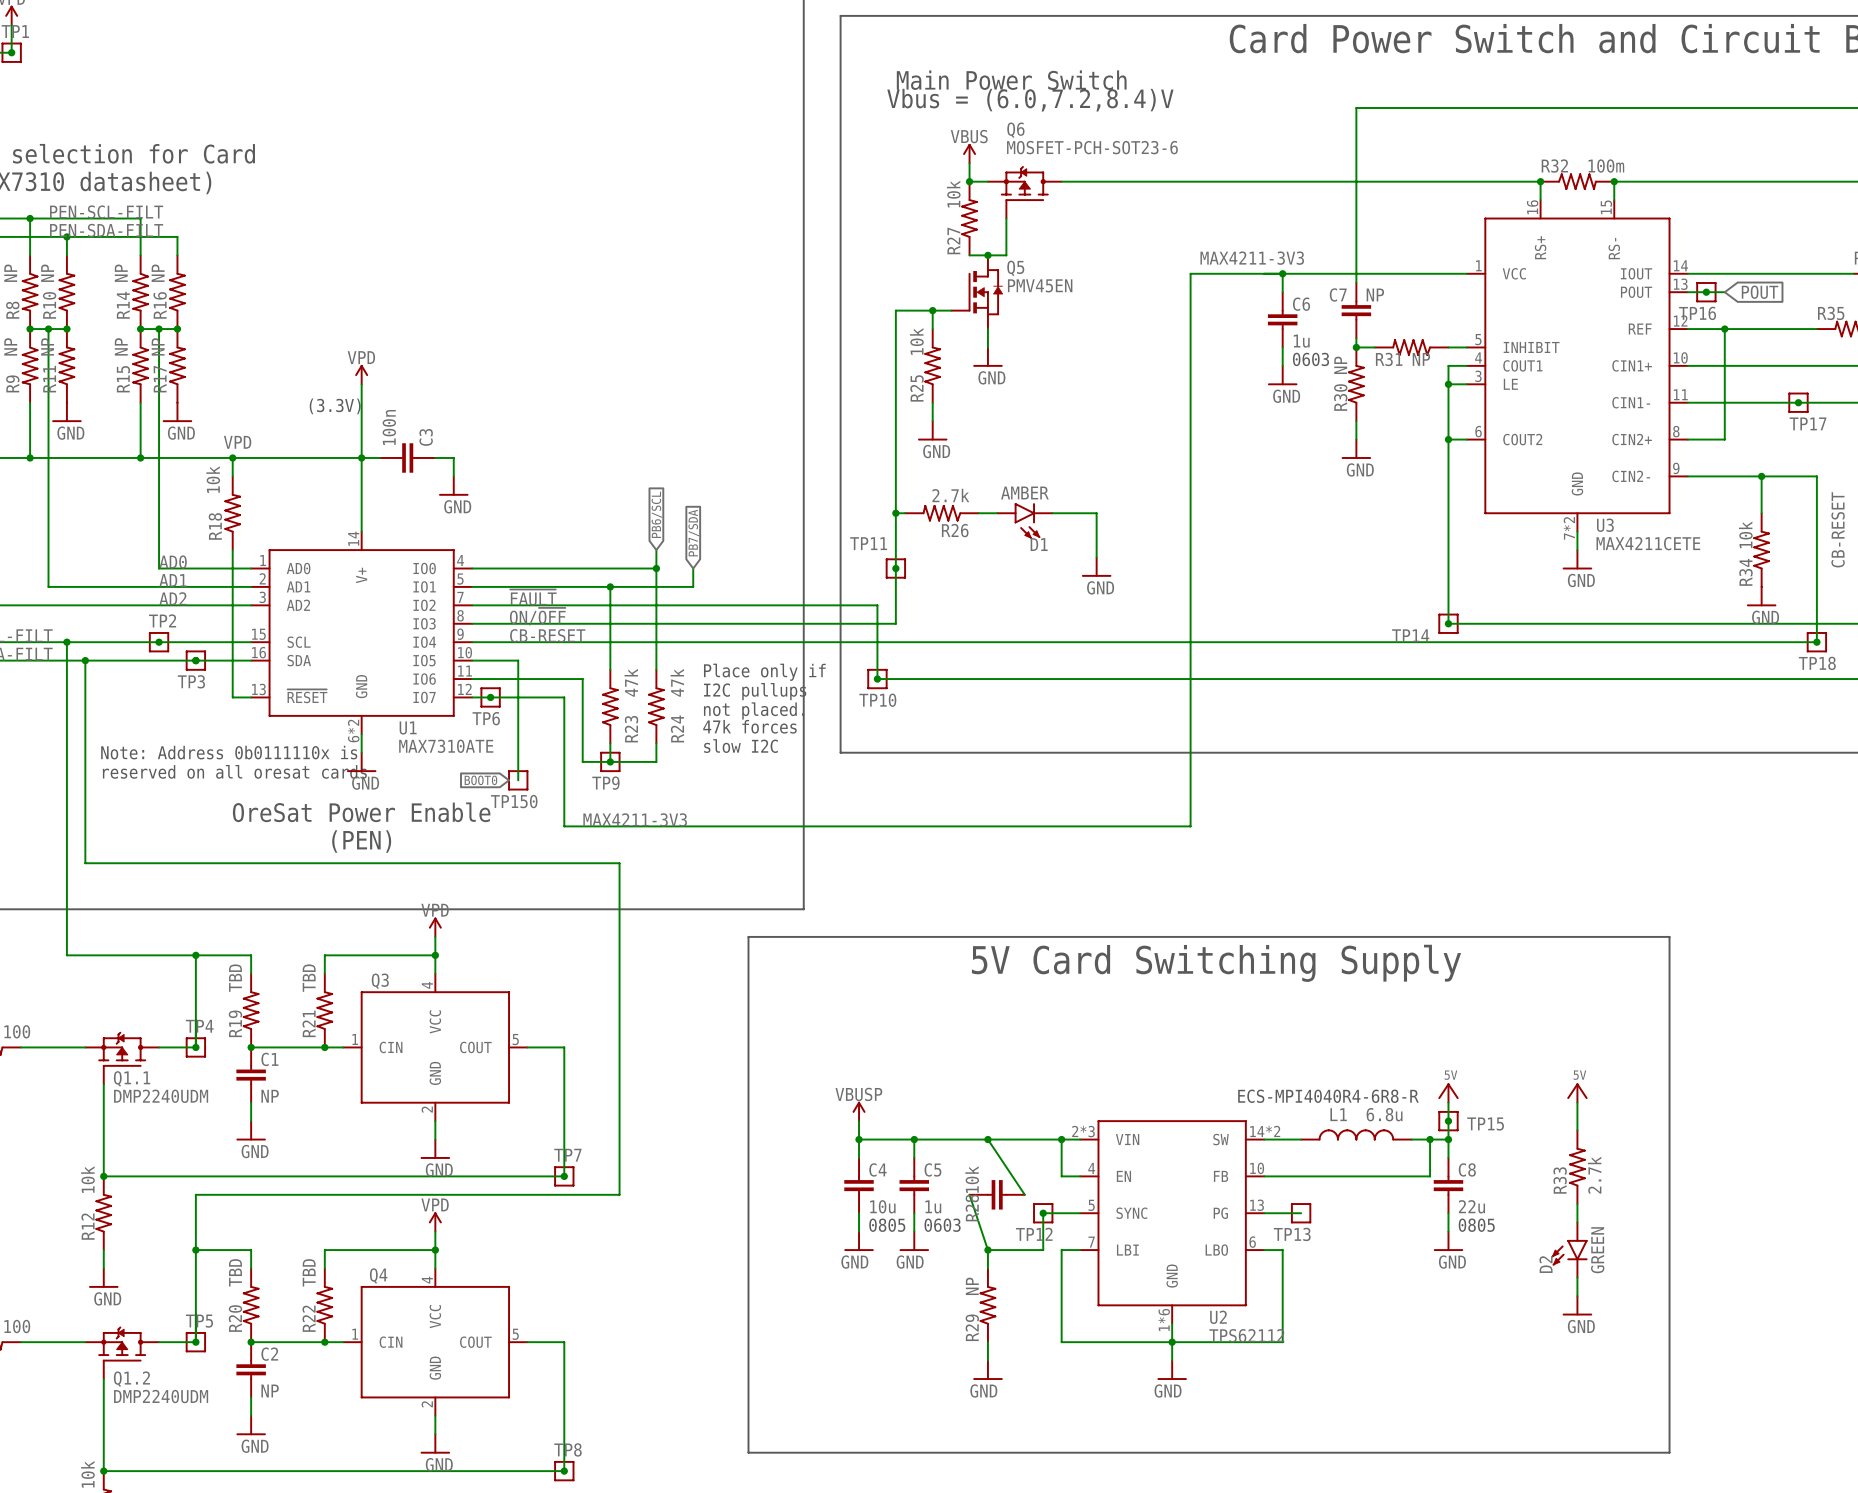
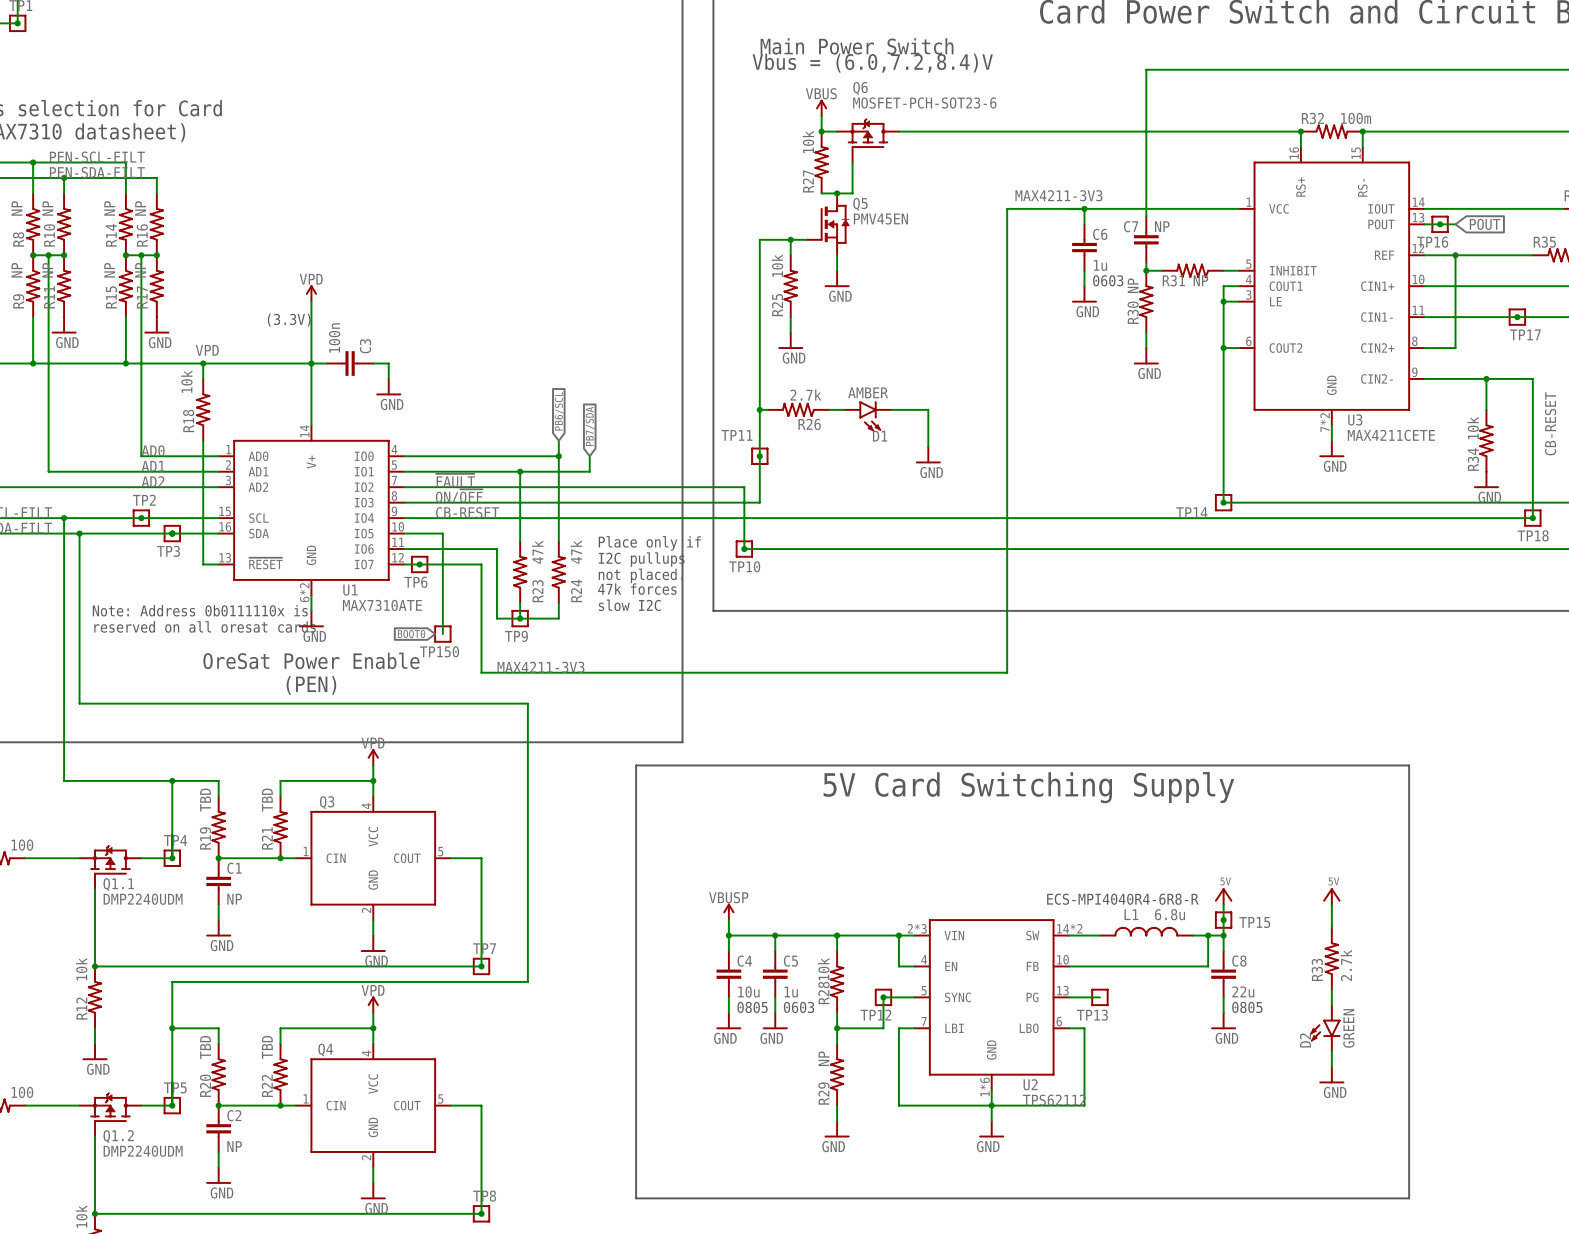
wire: (987, 1139) (1024, 1194) -> (837, 935) (837, 951)
R28 symbol: [969, 1180, 1025, 1210] -> [830, 951, 844, 1013]
wire: (969, 1194) (987, 1250) -> (837, 1012) (837, 1028)

